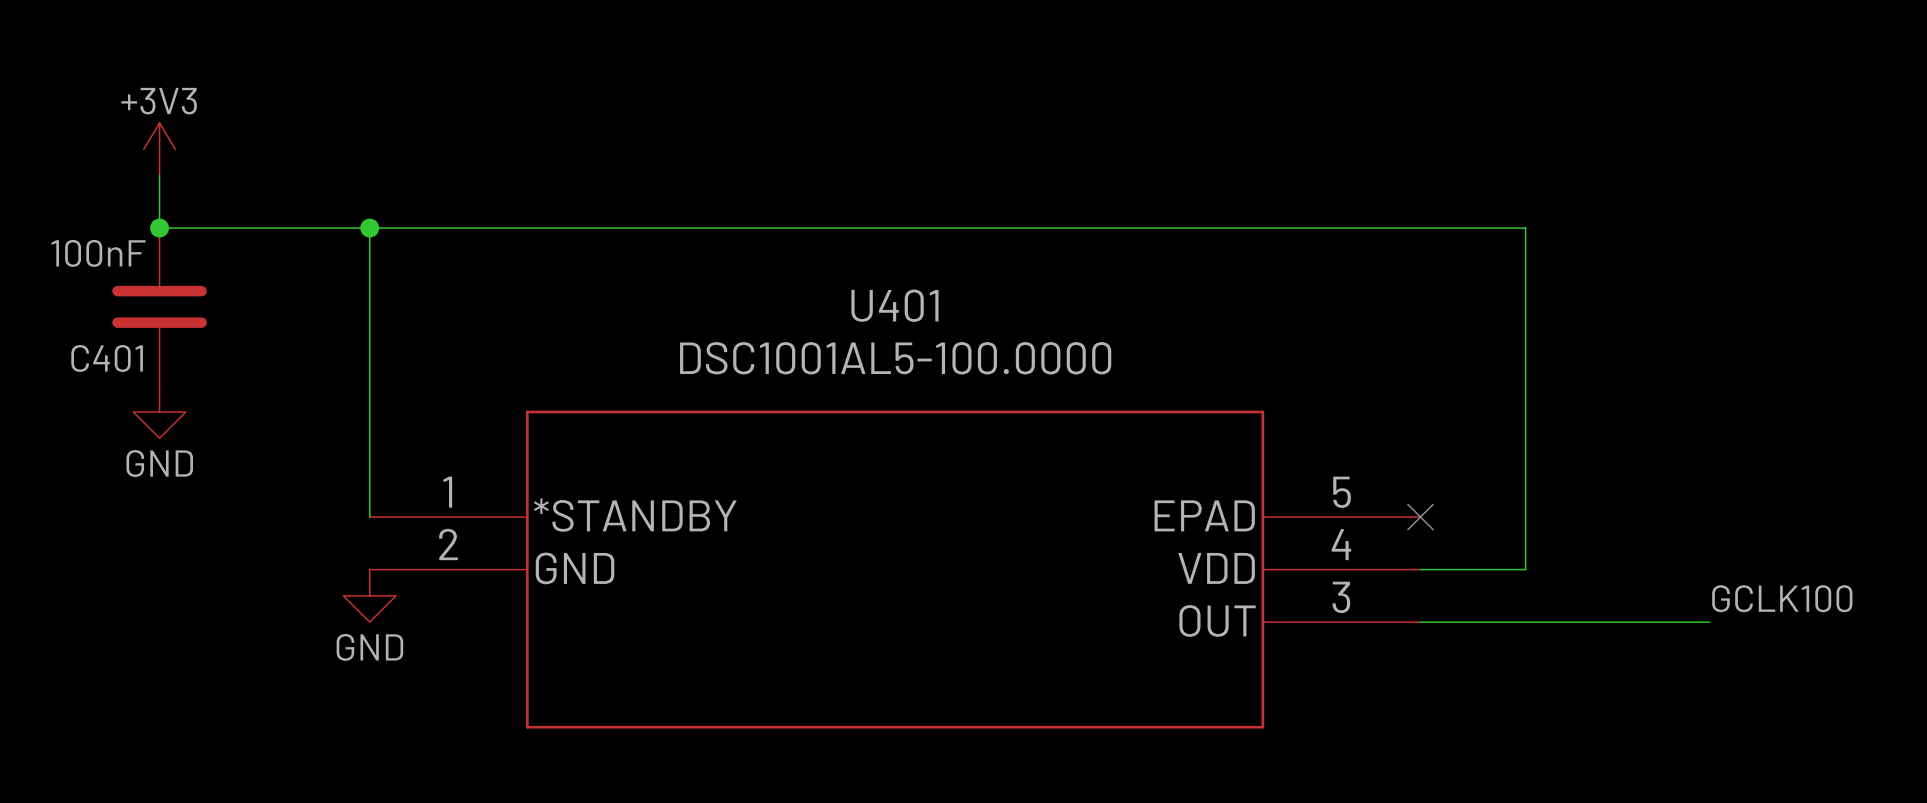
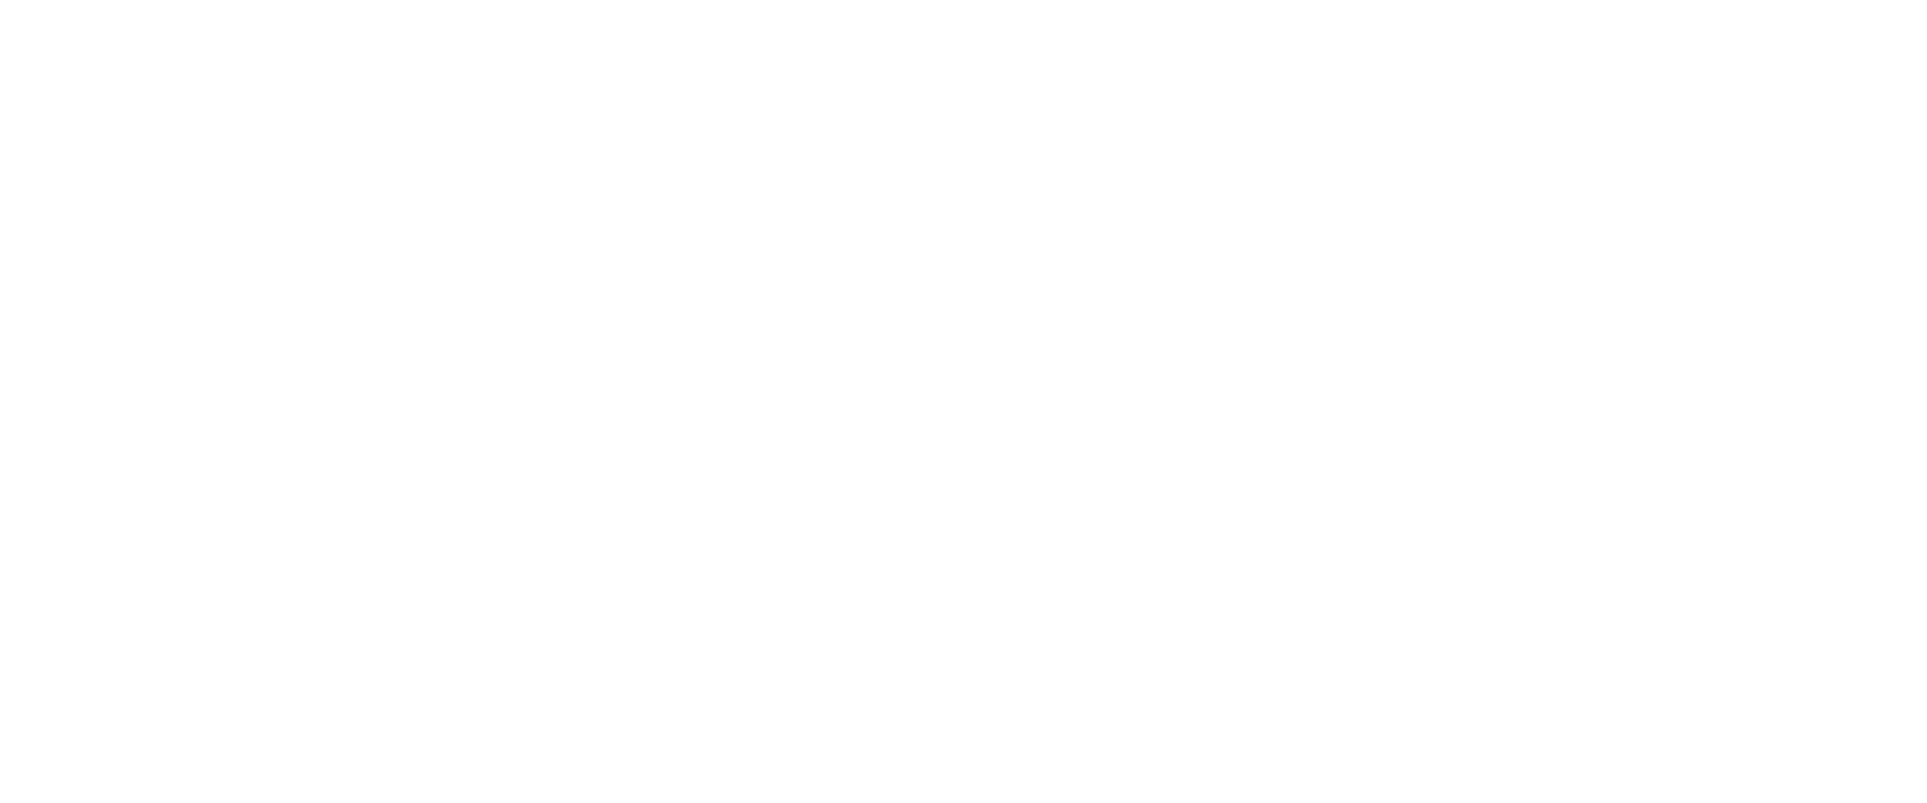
power symbol: +3V3 (159, 149) -> none
wire: (159, 175) (159, 228) (1525, 228) (1525, 569) (1420, 569) -> none
junction: (159, 228) -> none
wire: (369, 228) (369, 517) -> none
junction: (369, 228) -> none
C401: 100nF (159, 306) -> none
power symbol: GND (159, 411) -> none
no-connect mark: (1420, 517) -> none
U401: DSC1001AL5-100.0000 (895, 569) -> none
power symbol: GND (369, 595) -> none
label: GCLK100 (1782, 598) -> none
wire: (1420, 622) (1709, 622) -> none

